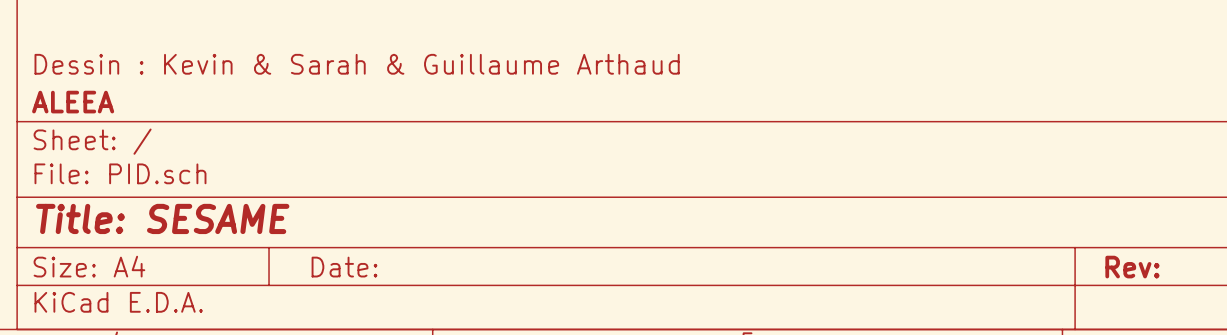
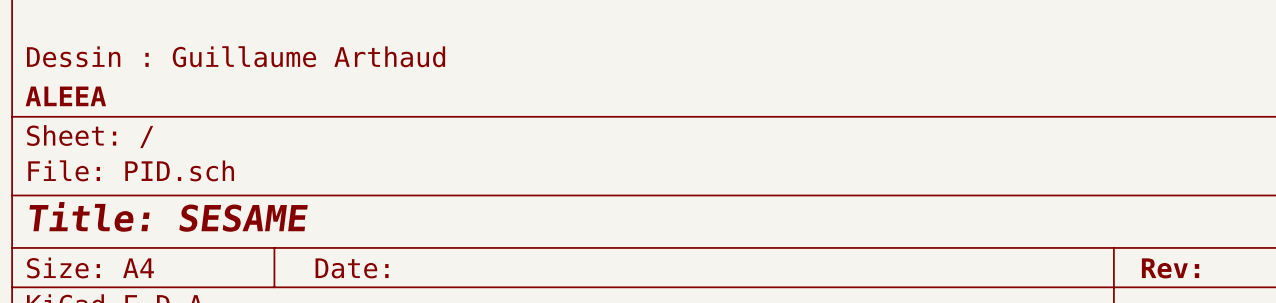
title block: Dessin : Kevin & Sarah & Guillaume Arthaud (357, 64) -> Dessin : Guillaume Arthaud (236, 56)

